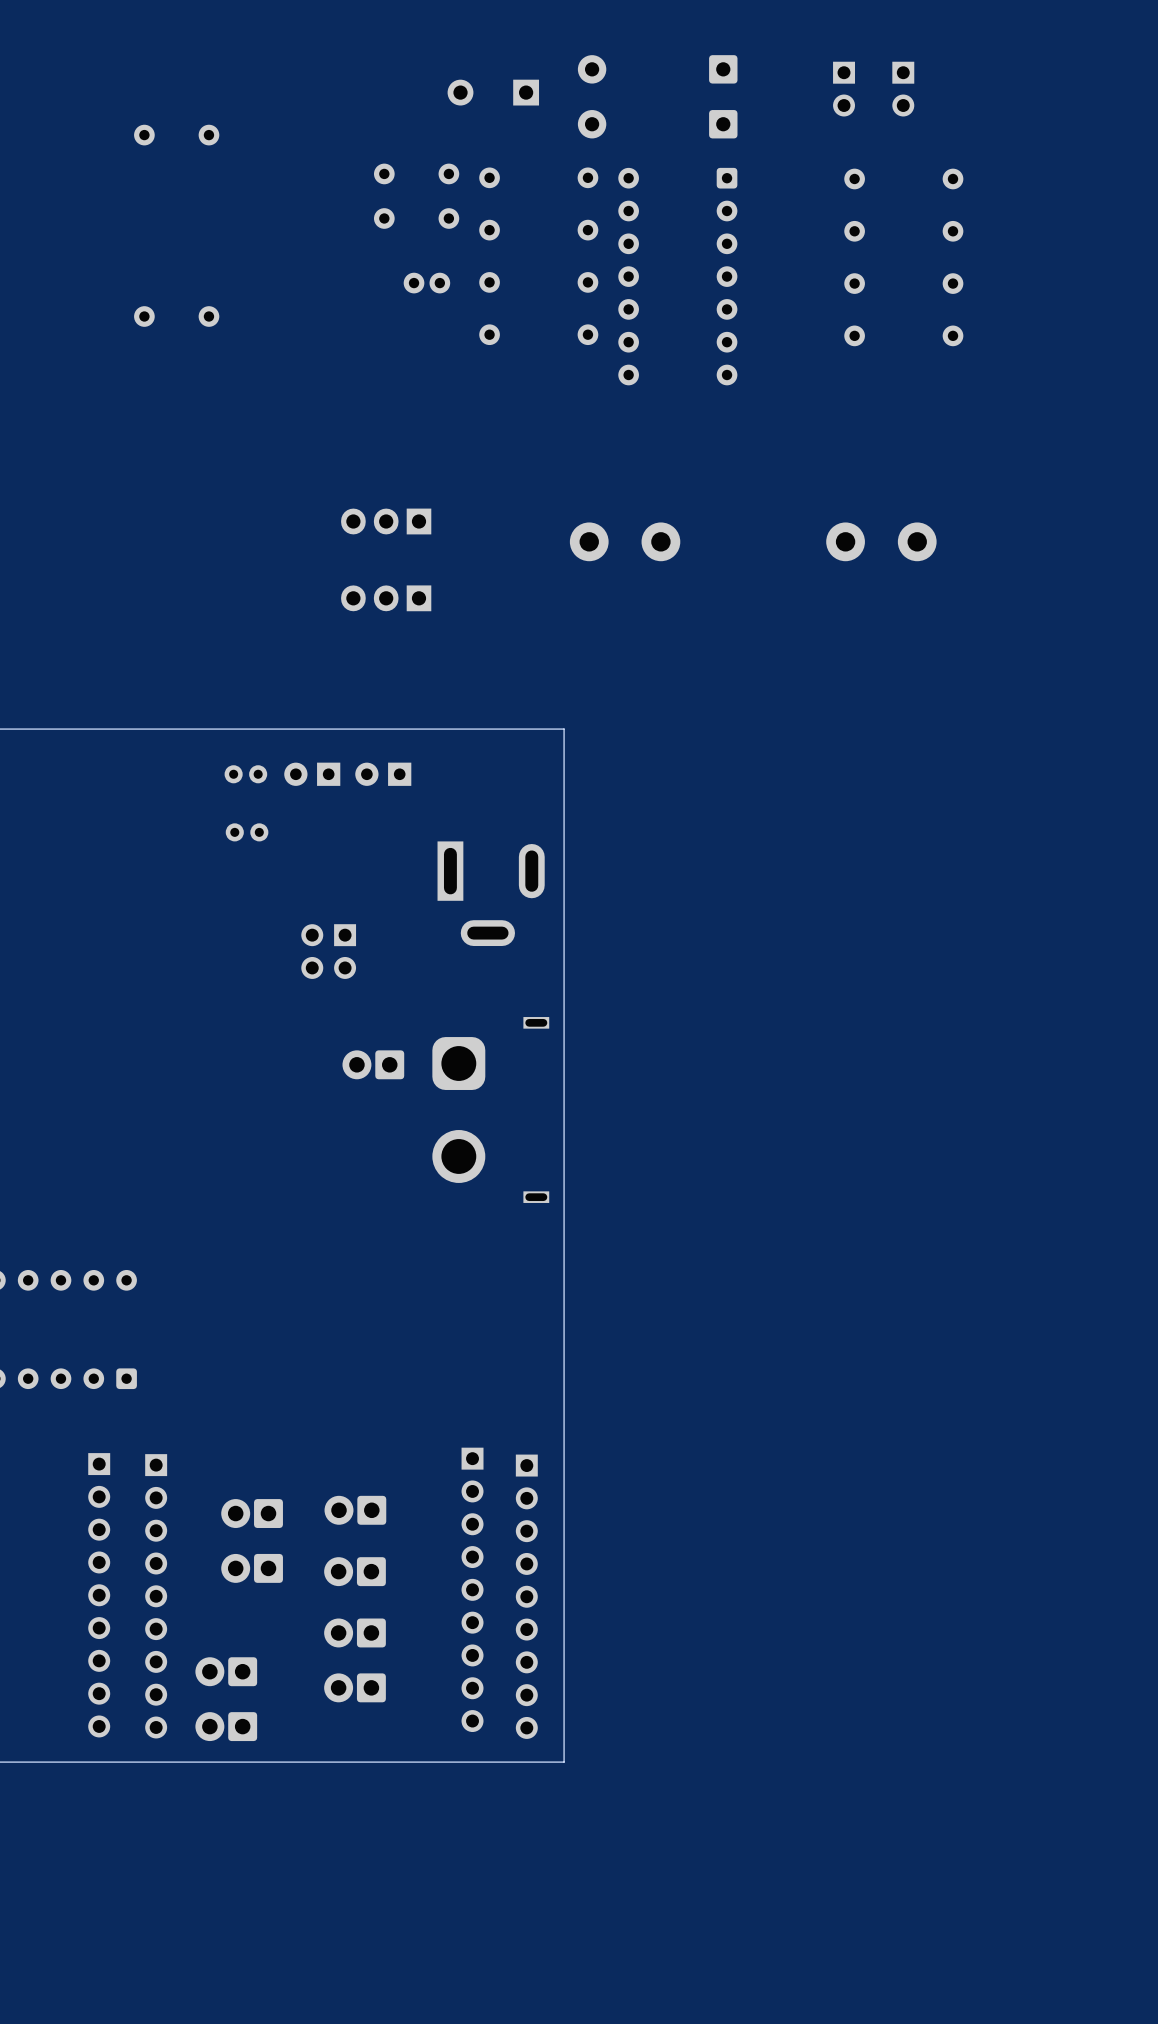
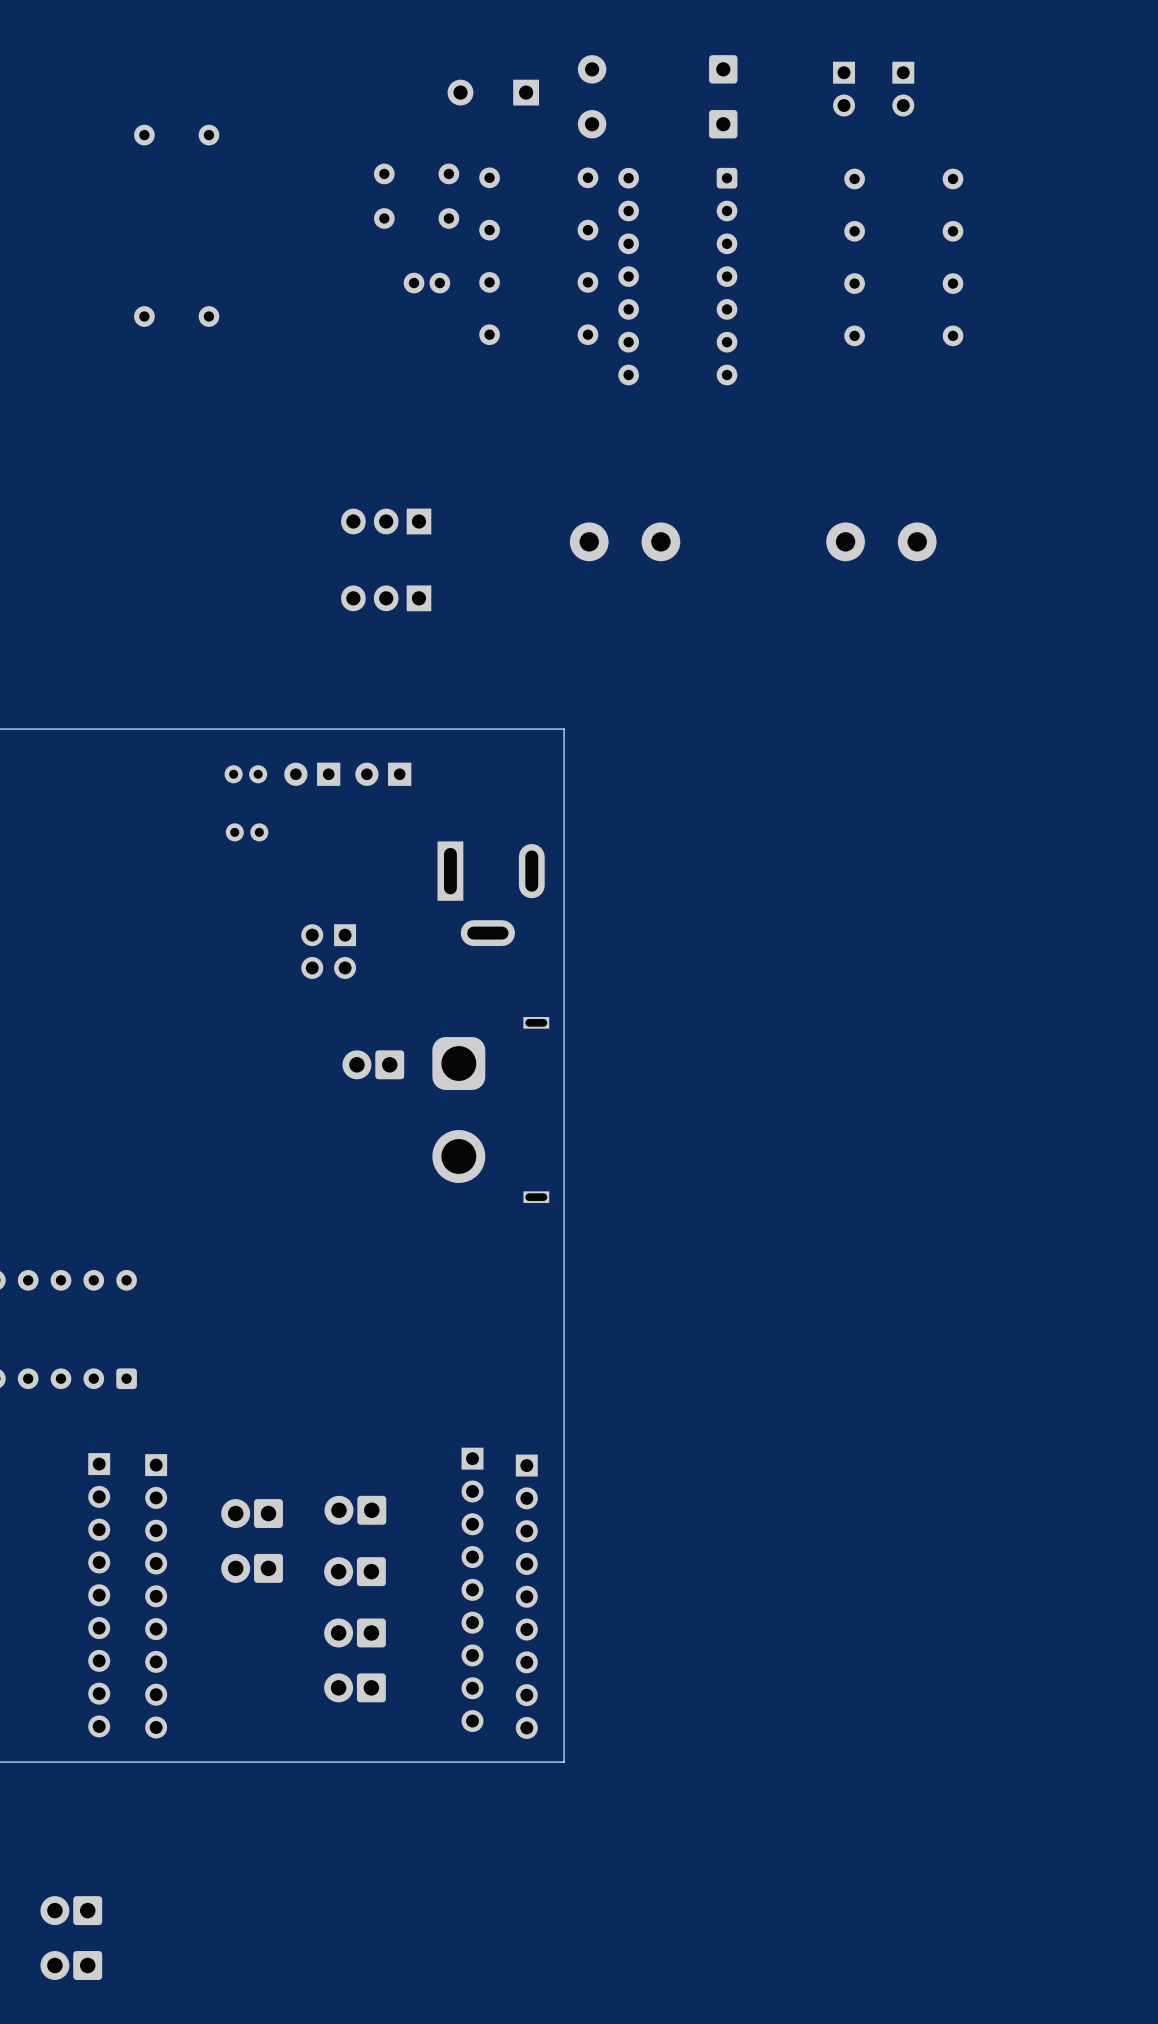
part: (226, 1671) -> none
part: (226, 1726) -> none
part: none -> (71, 1910)
part: none -> (71, 1965)

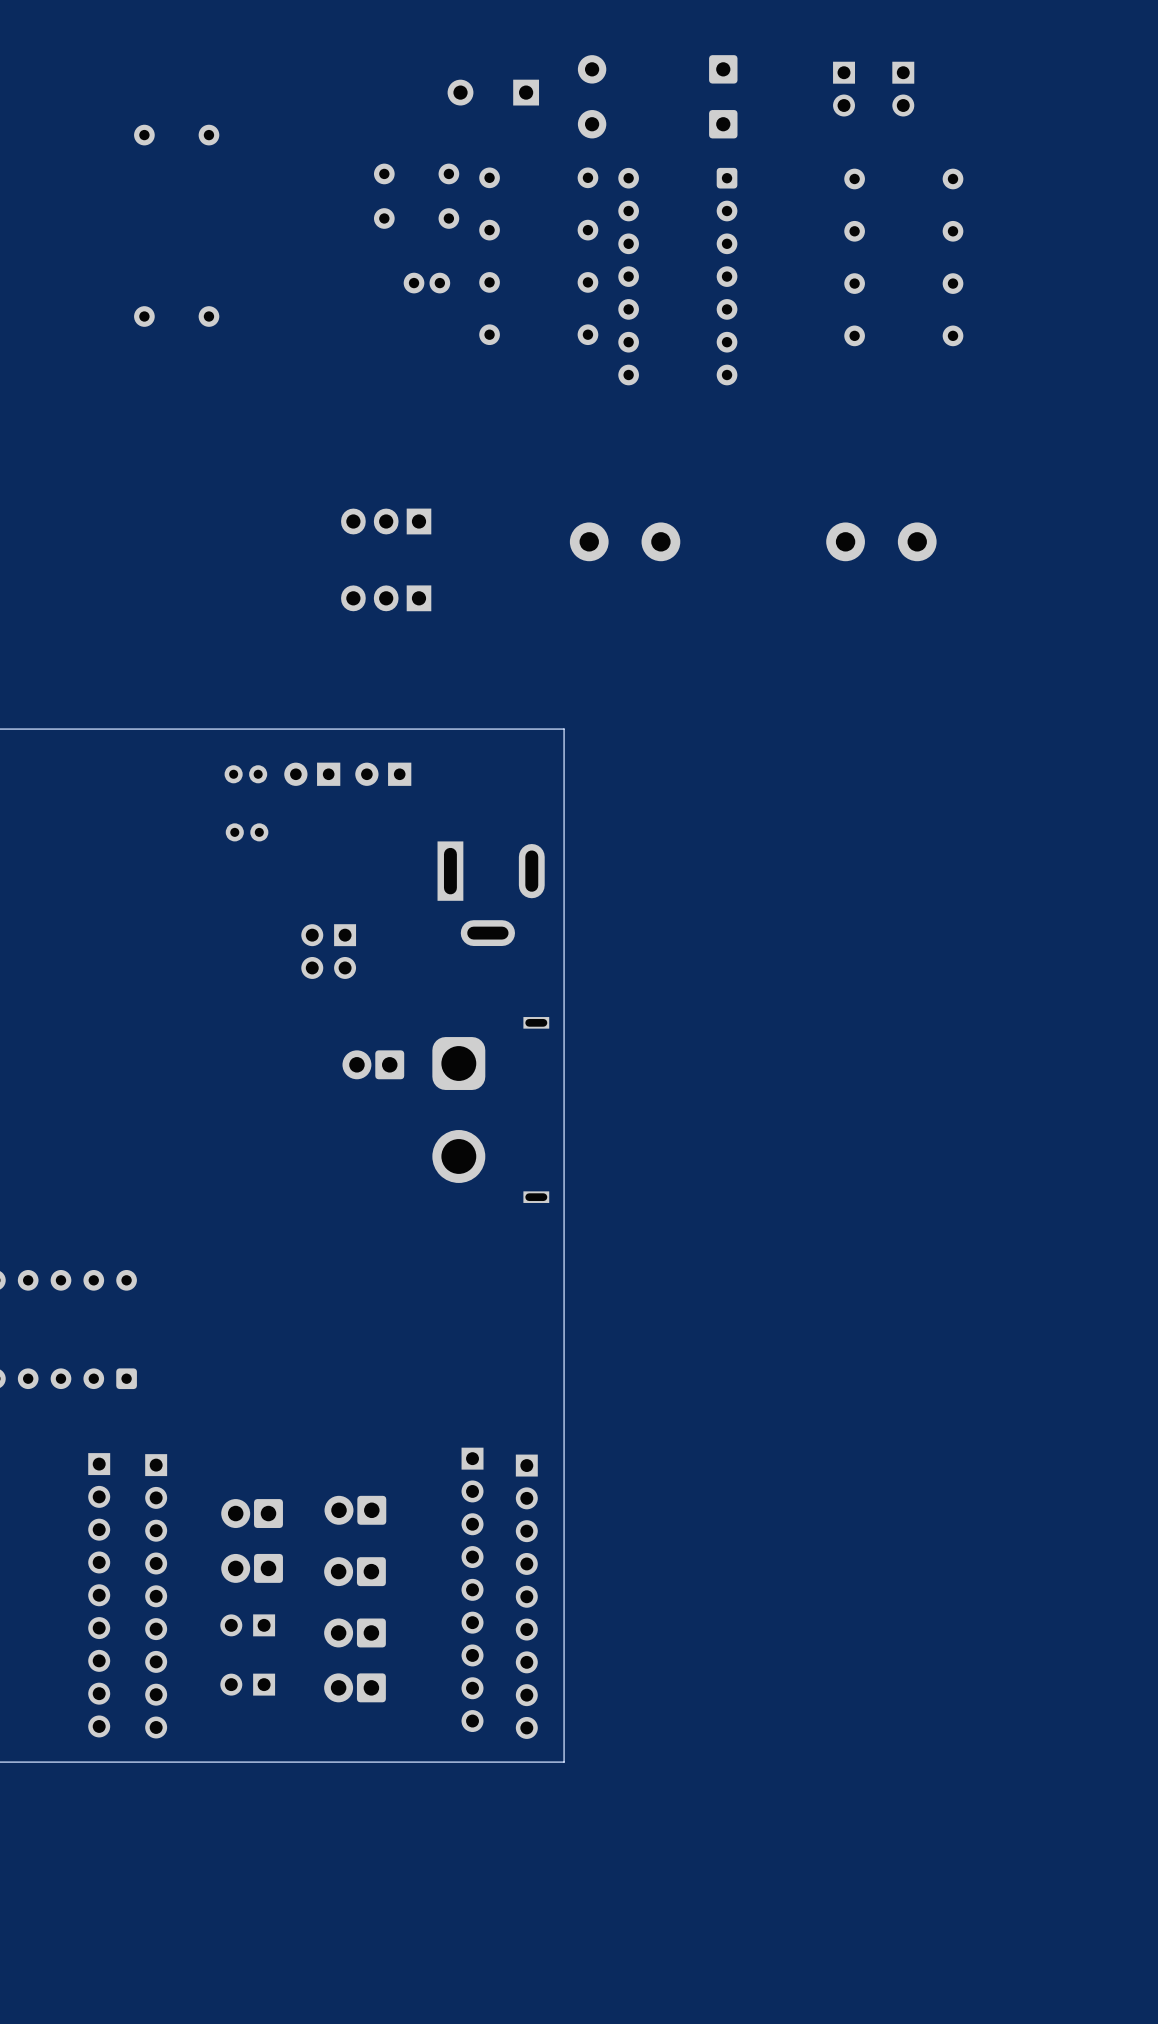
part: none -> (247, 1625)
part: none -> (247, 1684)
part: (71, 1910) -> none
part: (71, 1965) -> none

